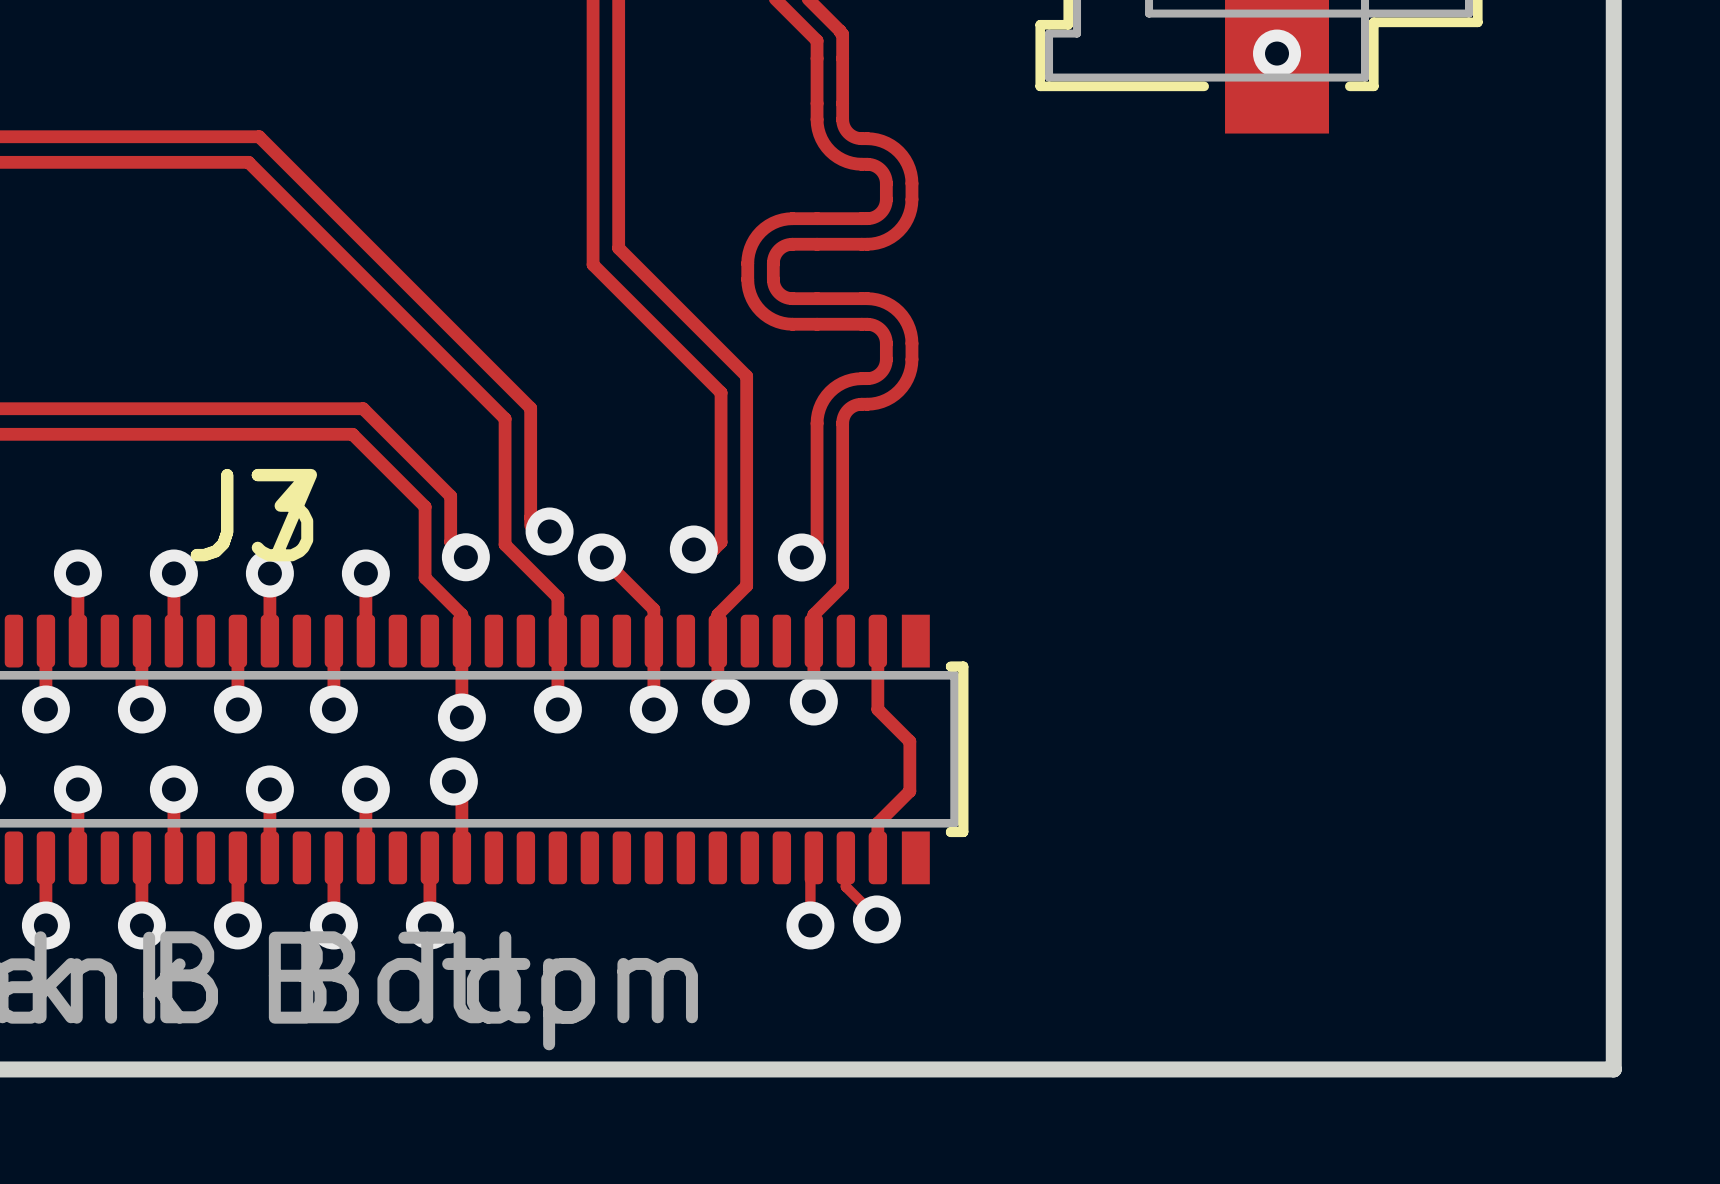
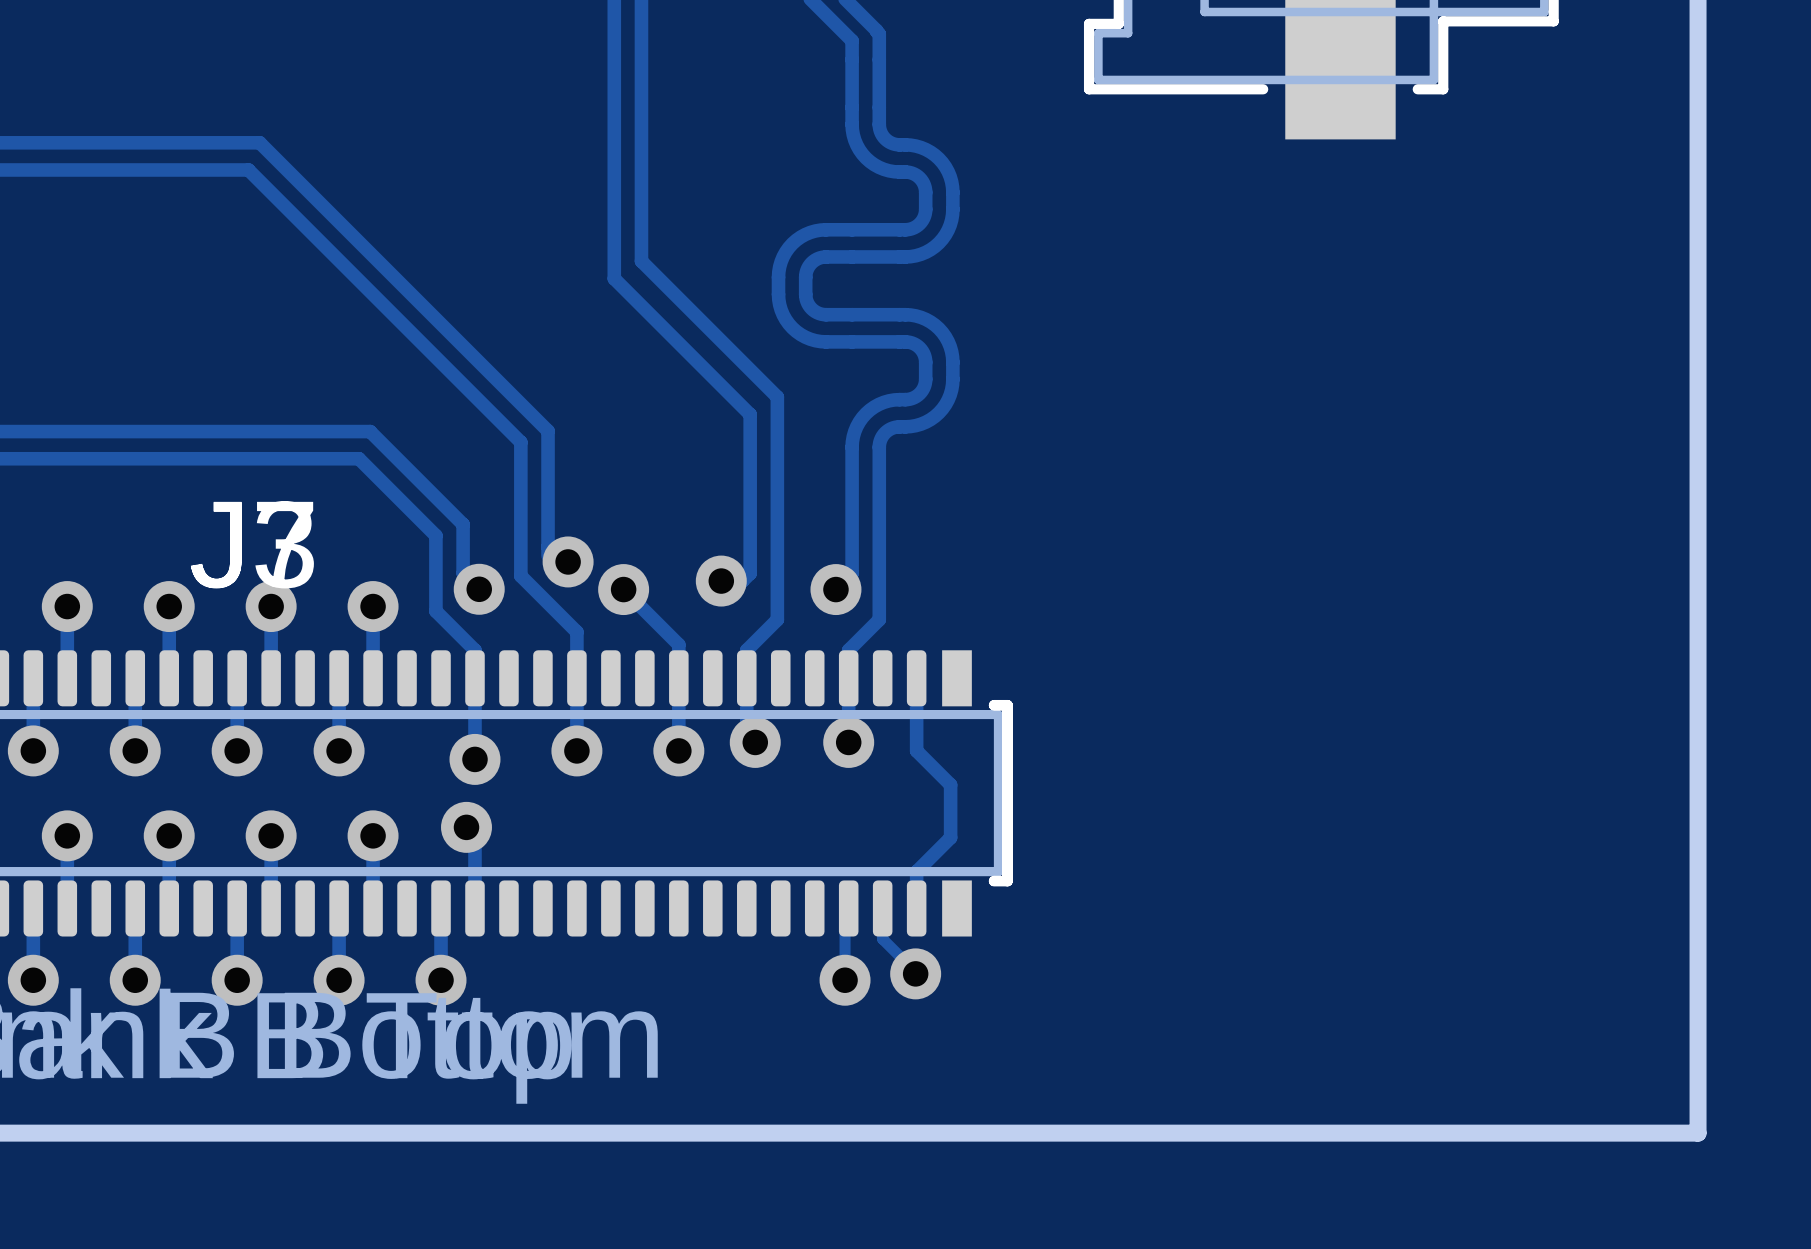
via: (1277, 53) -> none

